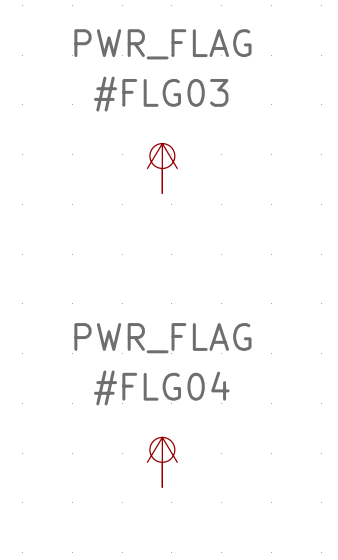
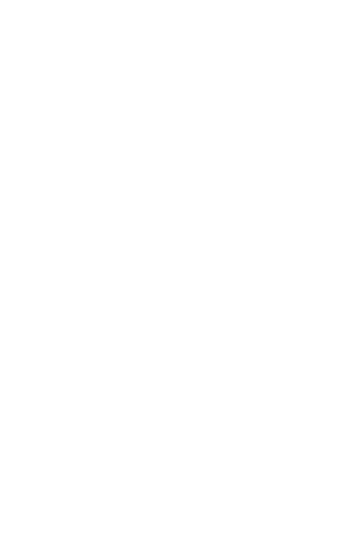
power symbol: (162, 168) -> none
#FLG03: PWR_FLAG (162, 168) -> none
power symbol: (162, 462) -> none
#FLG04: PWR_FLAG (162, 462) -> none

